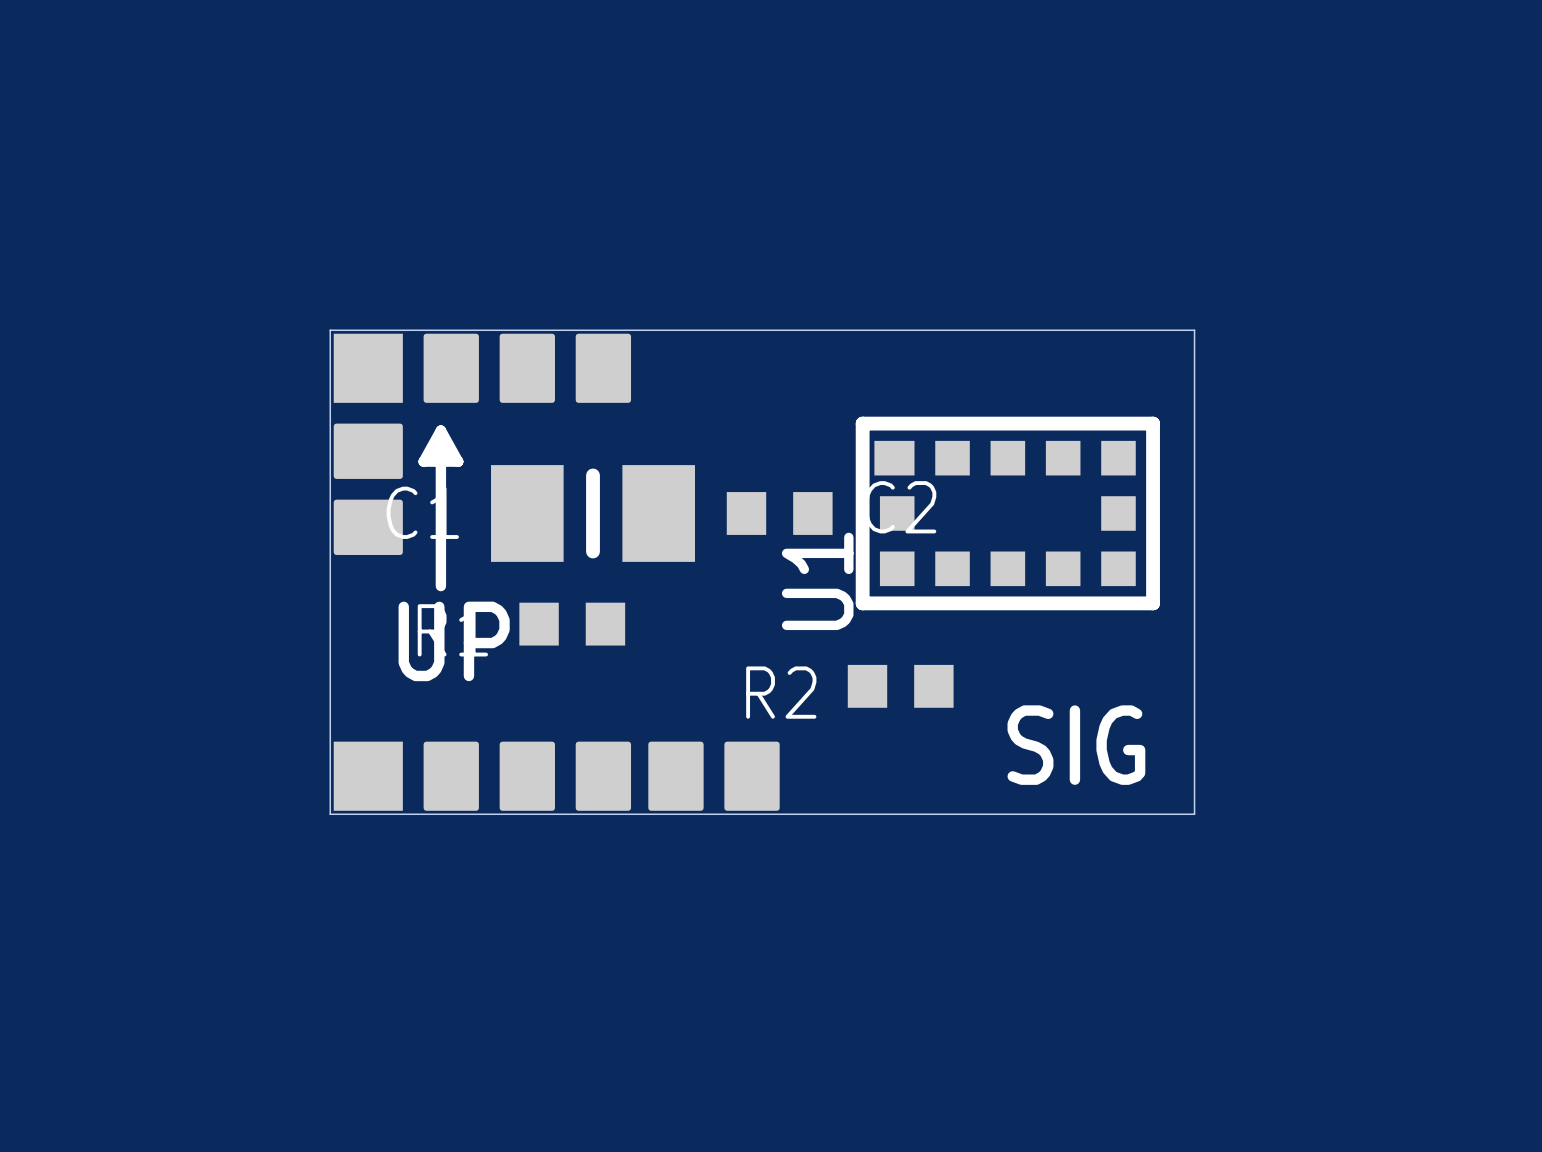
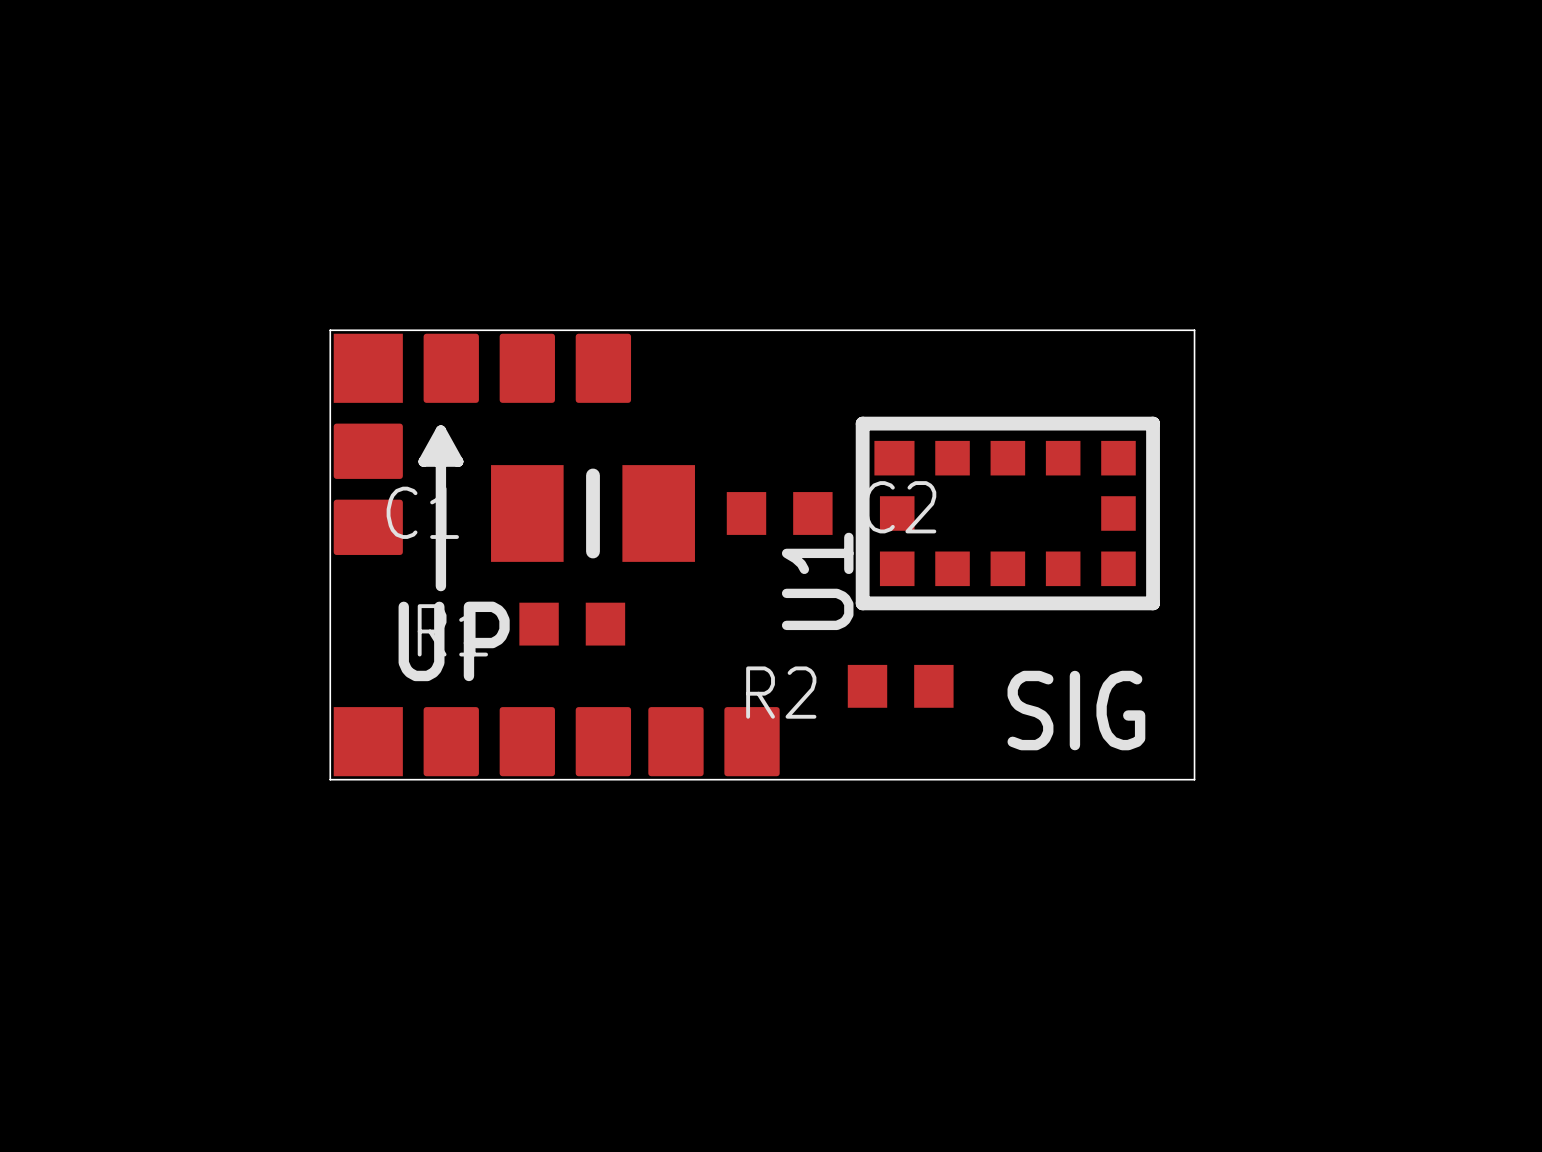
text position: SIG (1076, 745) -> SIG (1076, 710)
part position: (368, 776) -> (368, 741)
part position: (451, 776) -> (451, 741)
part position: (527, 776) -> (527, 741)
part position: (603, 776) -> (603, 741)
part position: (675, 776) -> (675, 741)
part position: (752, 776) -> (752, 741)
board edge: (330, 779) (330, 814) (1194, 814) (1194, 779) -> (330, 779) (1194, 779)

